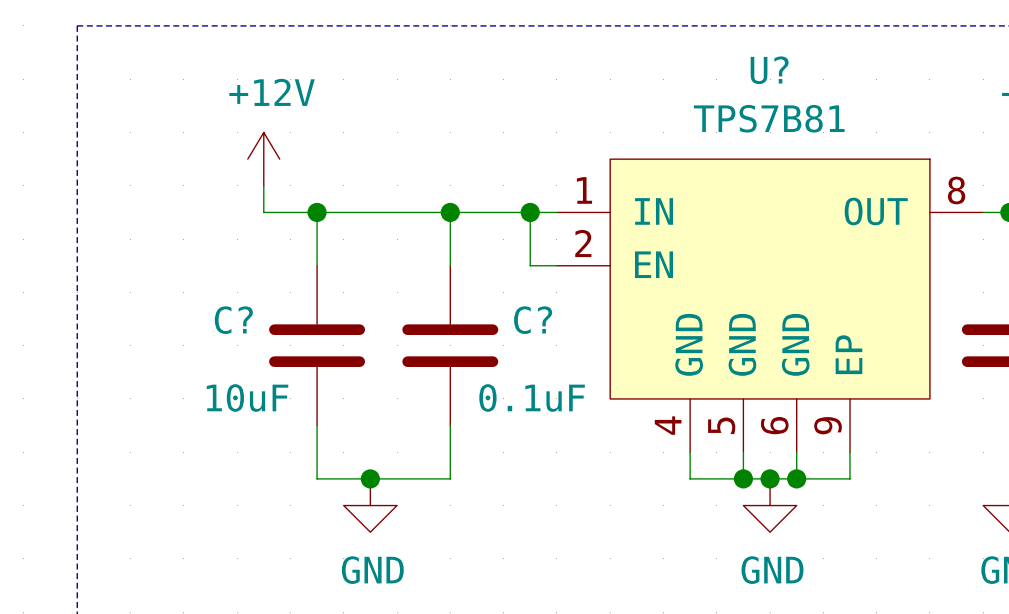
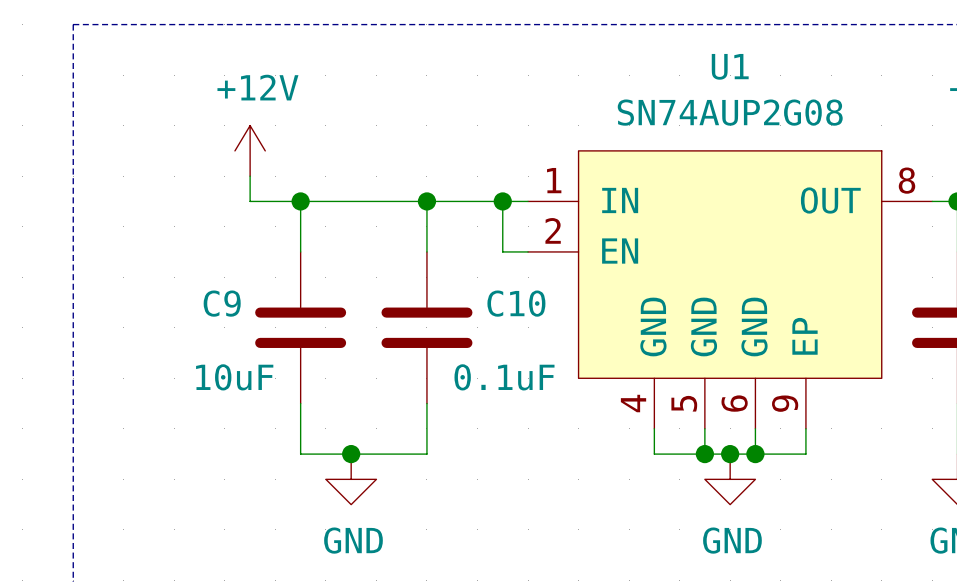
U? name: U? (769, 70) -> U1 (730, 66)
U? value: TPS7B81 (769, 118) -> SN74AUP2G08 (730, 112)
C? name: C? (233, 320) -> C9 (222, 303)
C? name: C? (533, 320) -> C10 (516, 303)

